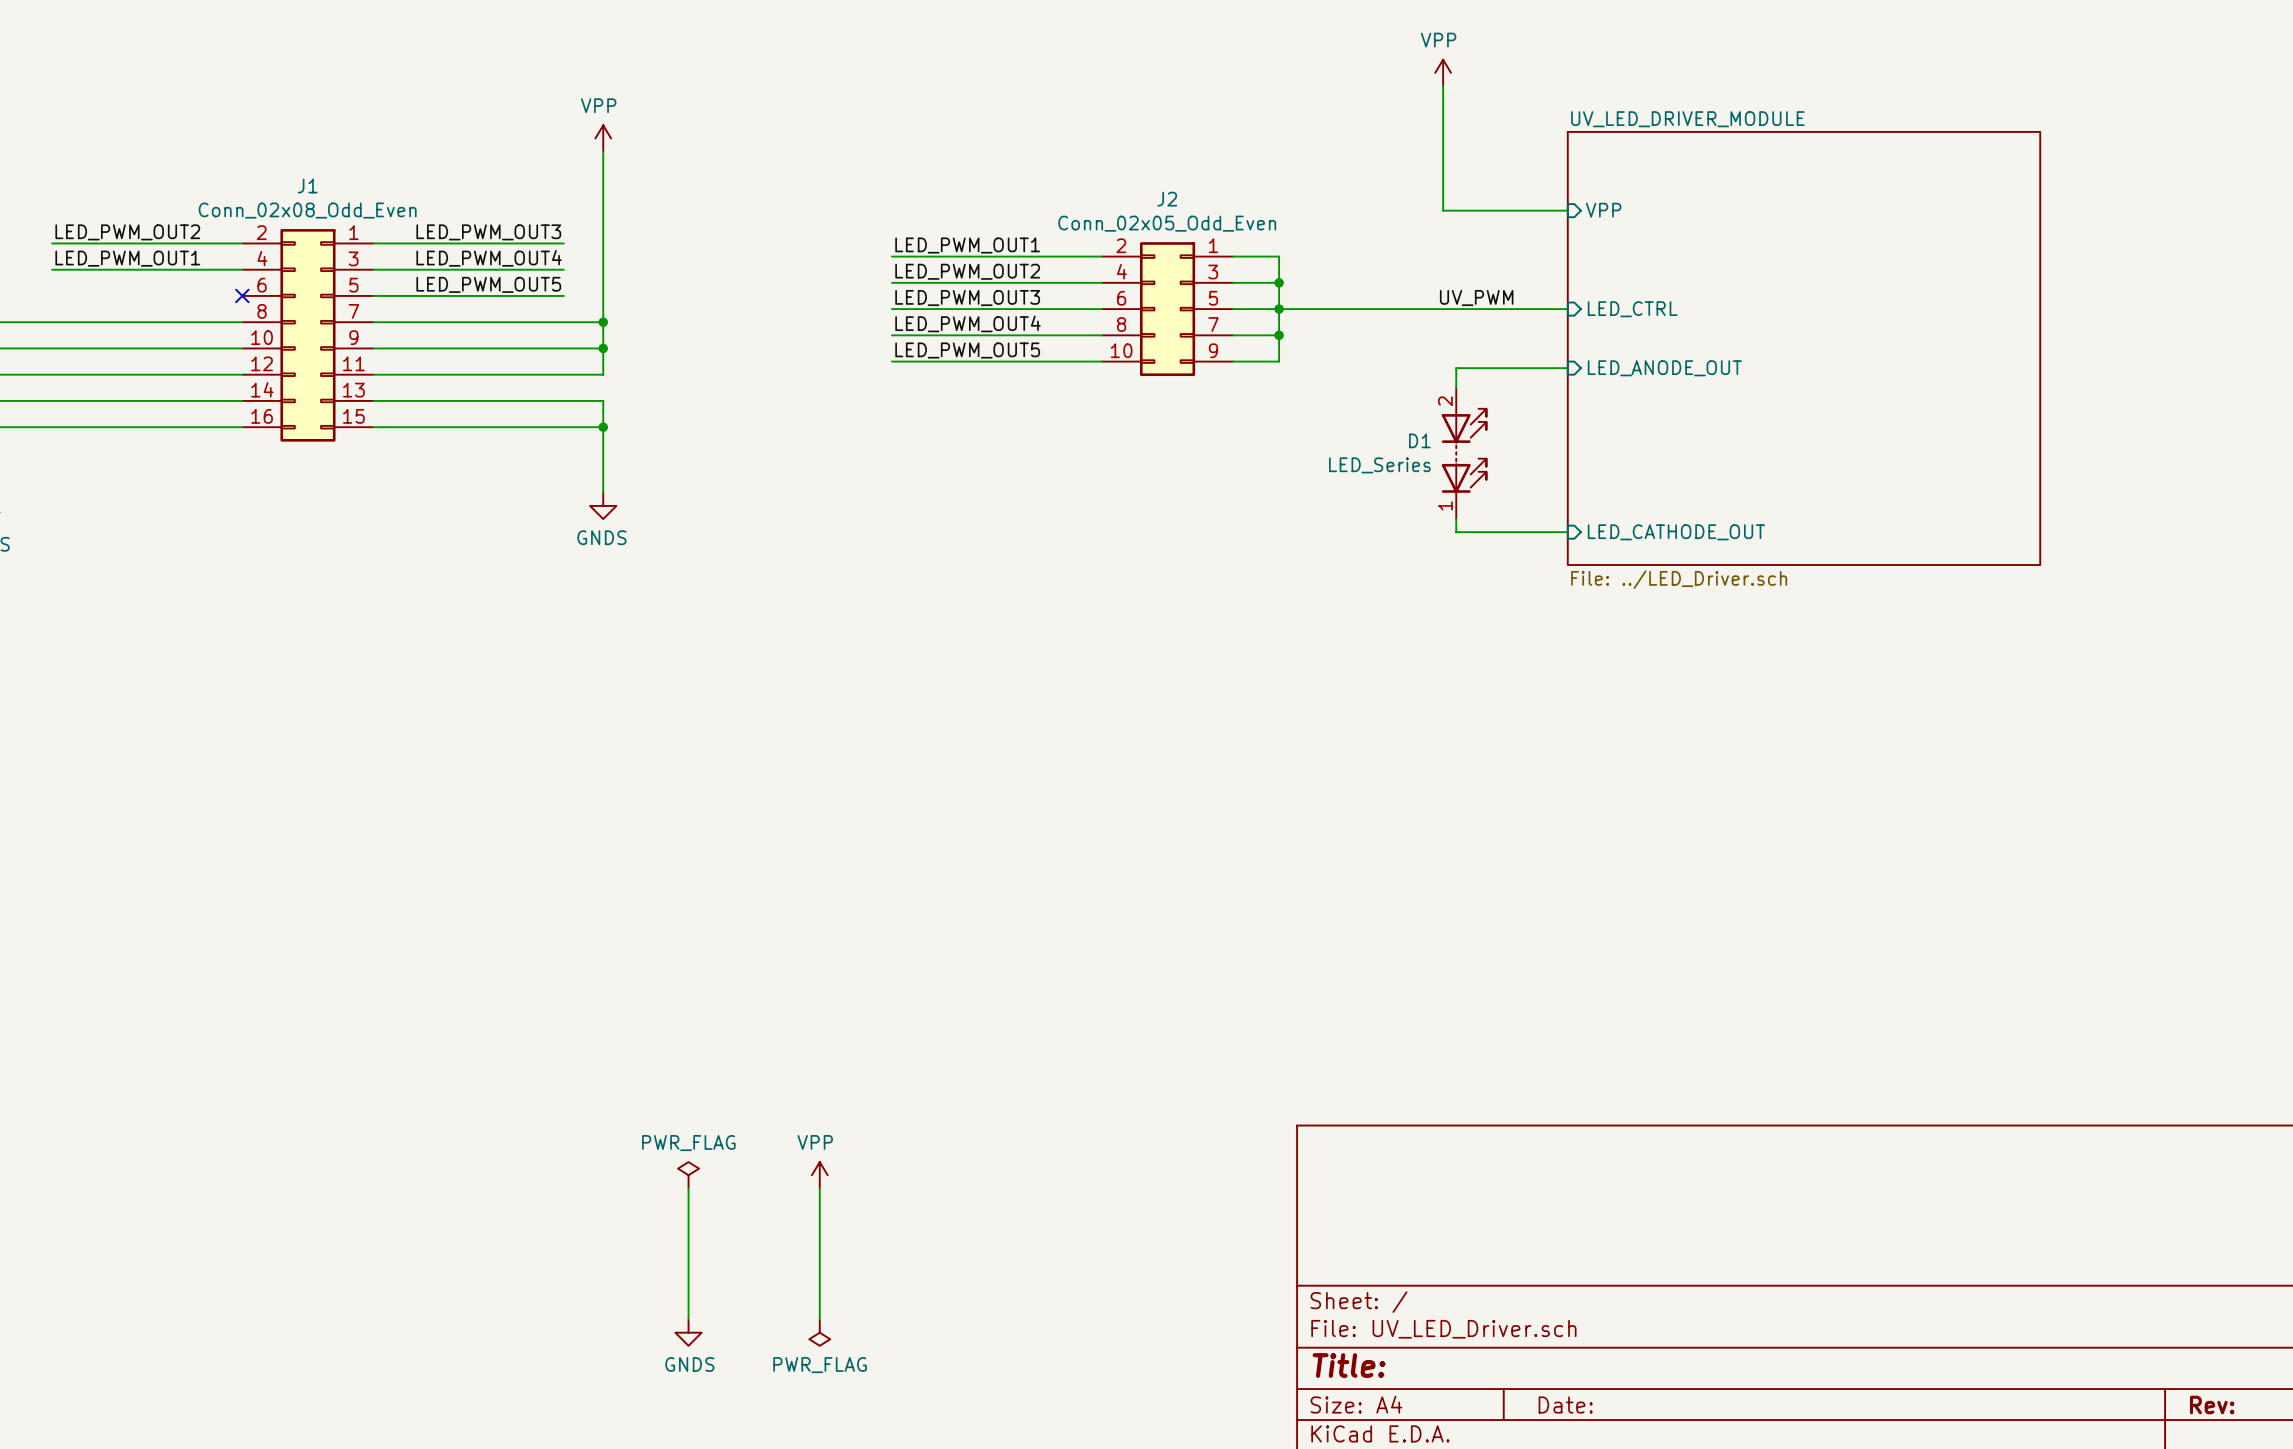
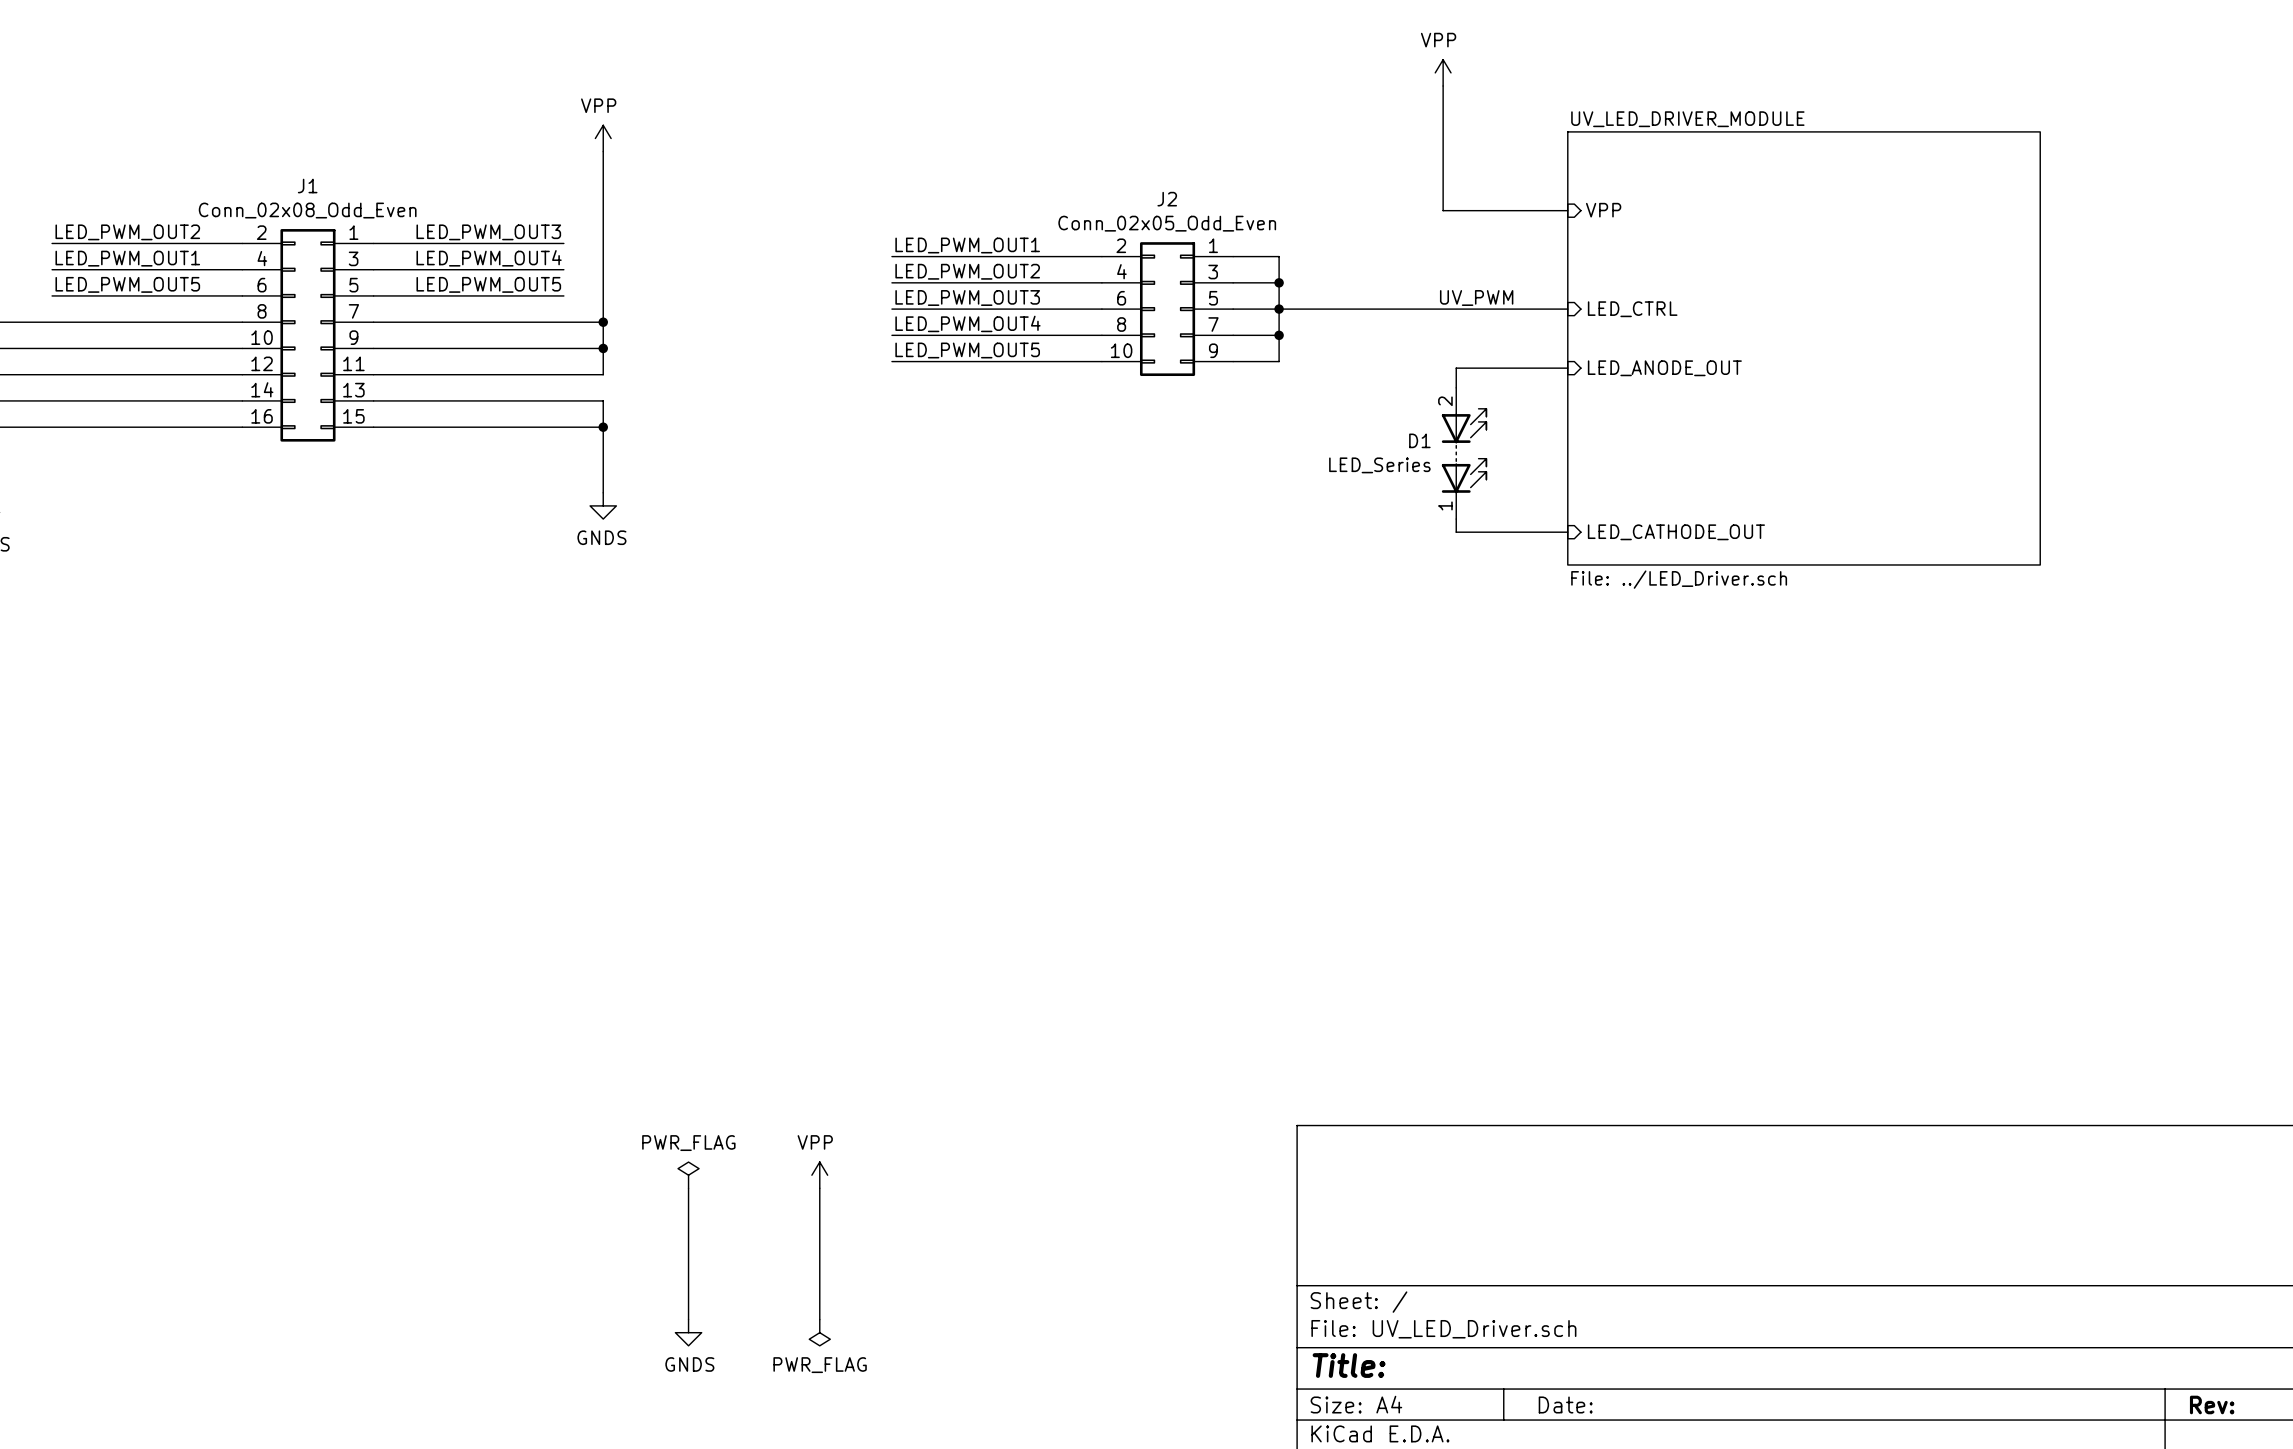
label: none -> LED_PWM_OUT5 (127, 284)
wire: none -> (52, 295) (242, 295)
no-connect mark: (242, 295) -> none

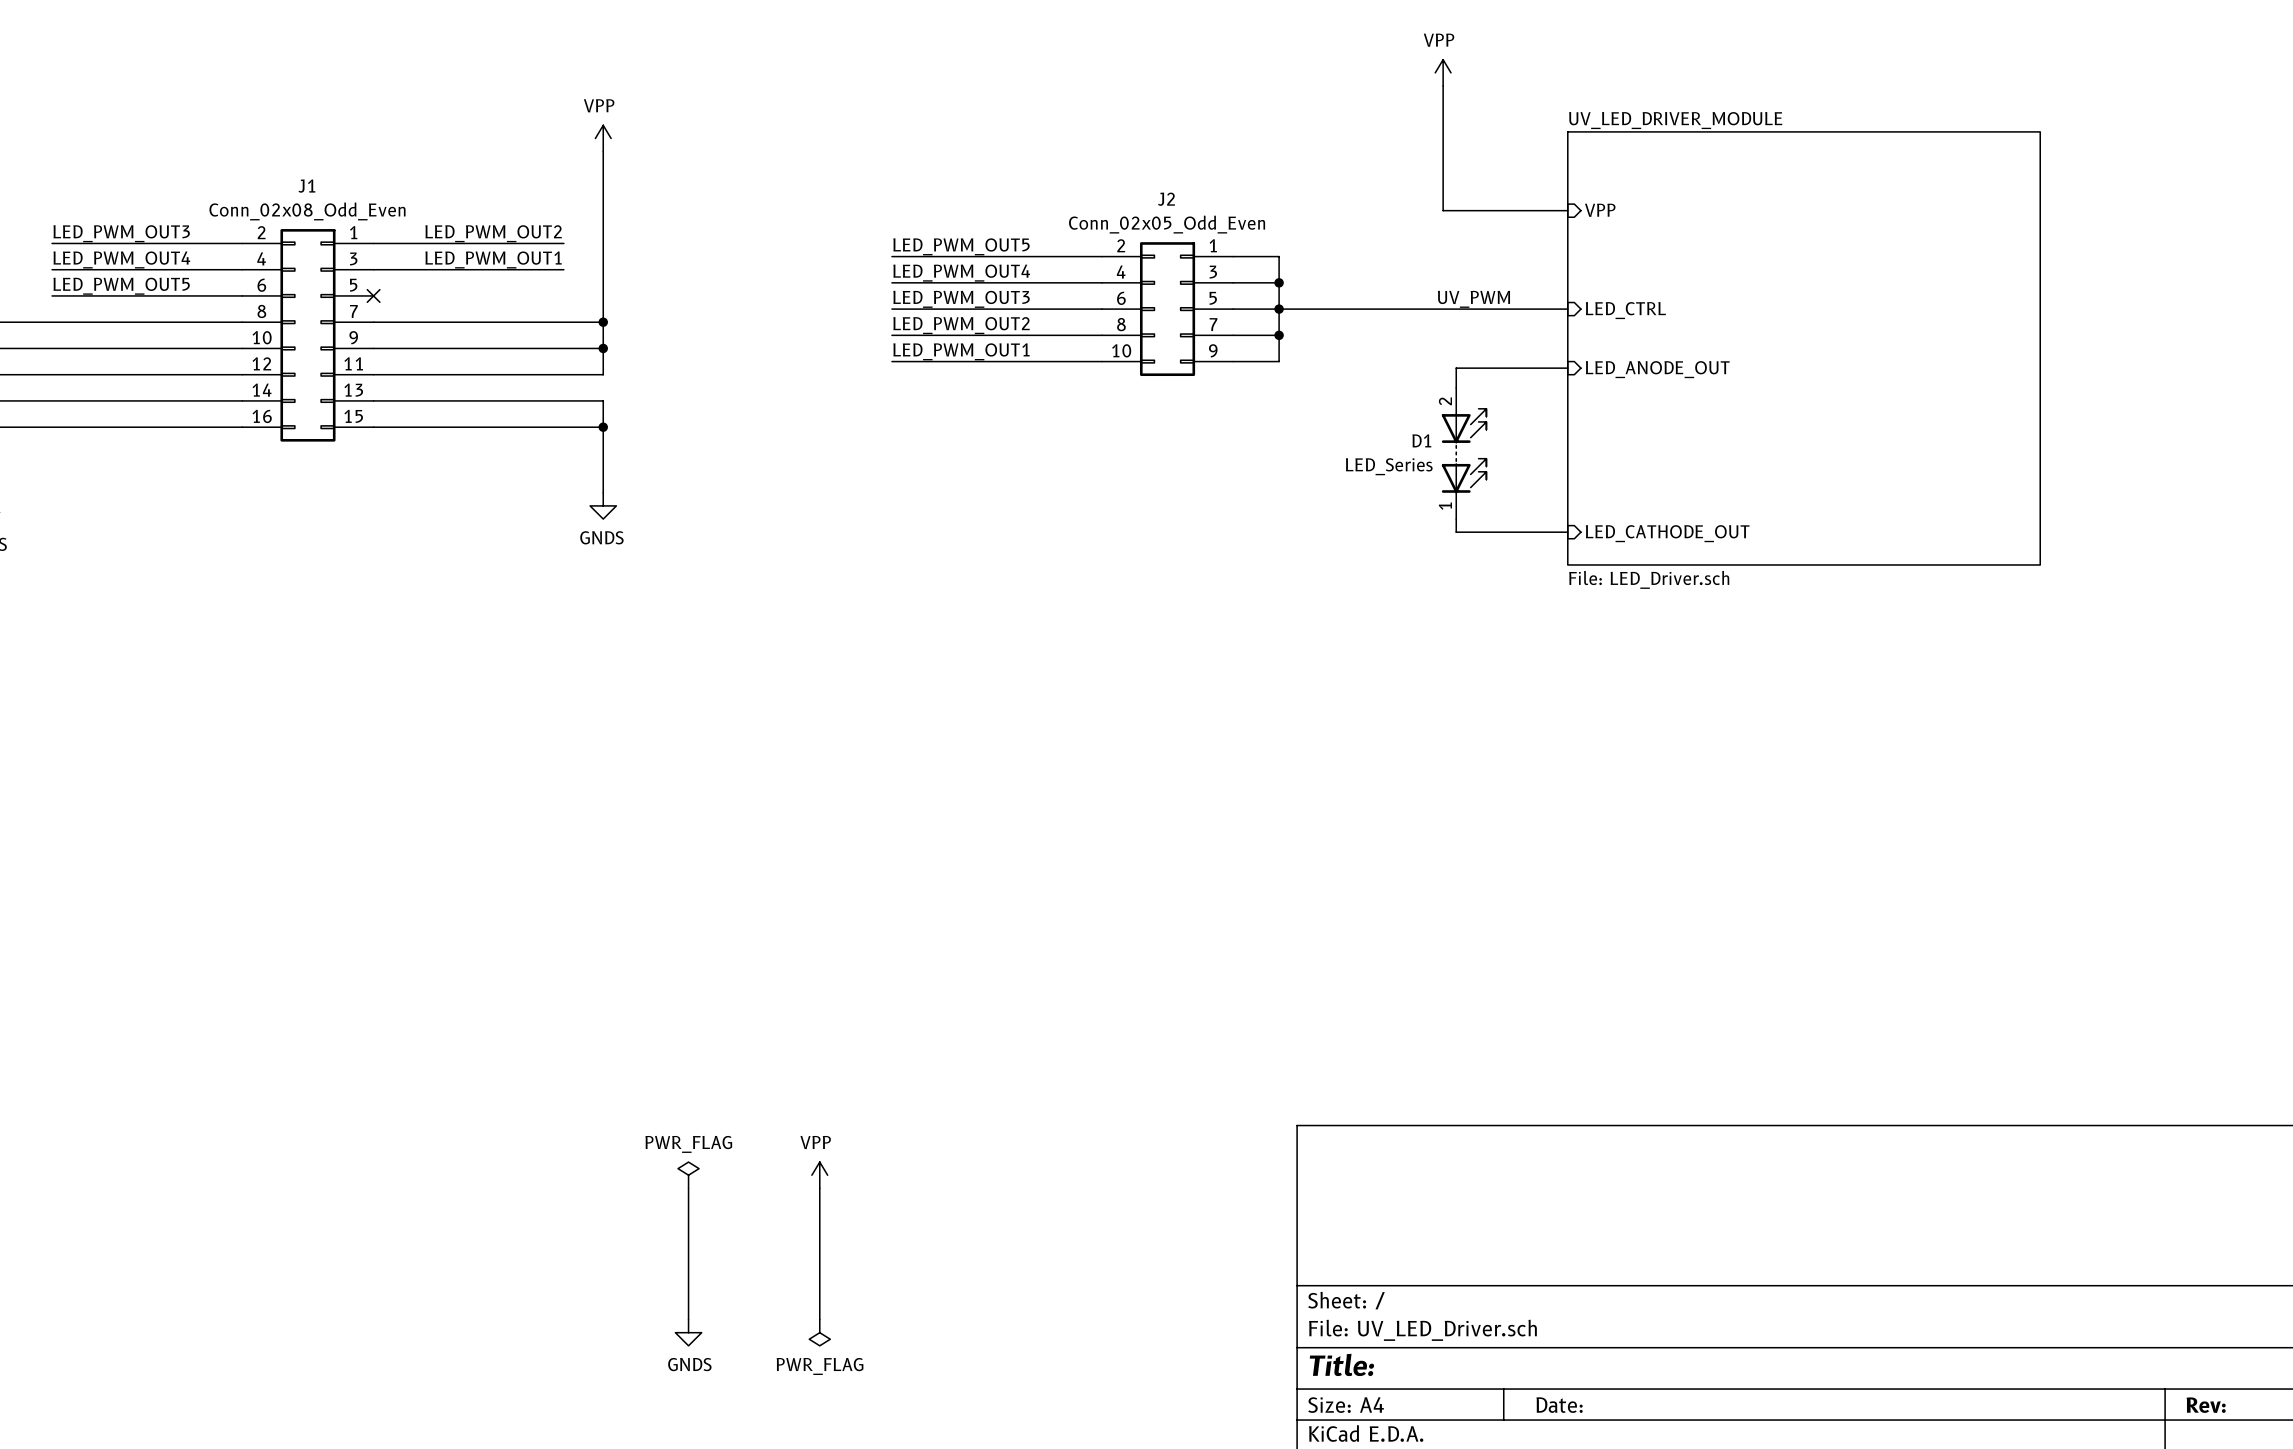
label: LED_PWM_OUT2 (127, 232) -> LED_PWM_OUT3 (121, 233)
label: LED_PWM_OUT3 (488, 232) -> LED_PWM_OUT2 (493, 233)
label: LED_PWM_OUT1 (967, 245) -> LED_PWM_OUT5 (961, 246)
label: LED_PWM_OUT1 (127, 258) -> LED_PWM_OUT4 (121, 259)
label: LED_PWM_OUT4 (489, 258) -> LED_PWM_OUT1 (493, 259)
label: LED_PWM_OUT2 (967, 271) -> LED_PWM_OUT4 (961, 273)
label: LED_PWM_OUT5 (488, 284) -> none
wire: (373, 295) (563, 295) -> none
no-connect mark: none -> (373, 295)
label: LED_PWM_OUT4 (967, 323) -> LED_PWM_OUT2 (961, 325)
label: LED_PWM_OUT5 (967, 350) -> LED_PWM_OUT1 (961, 351)
sheet UV_LED_DRIVER_MODULE value: File: ../LED_Driver.sch (1679, 579) -> File: LED_Driver.sch (1649, 579)

